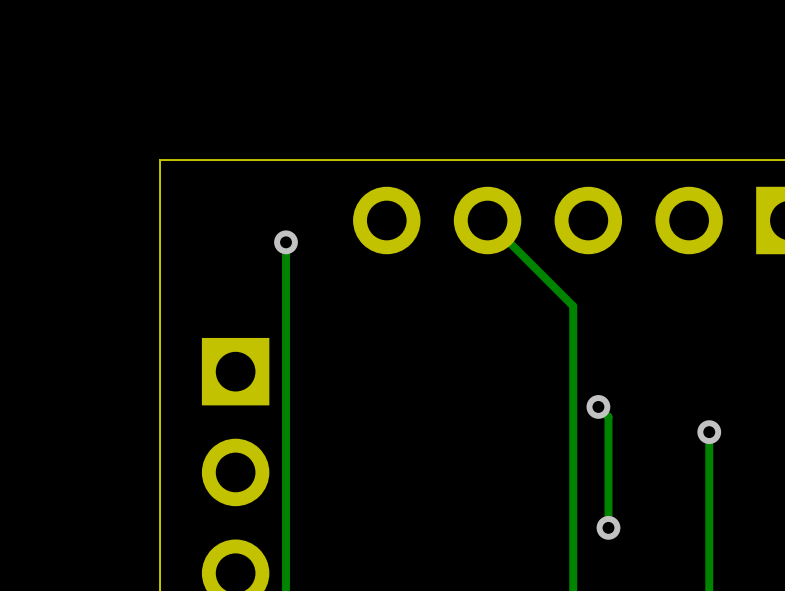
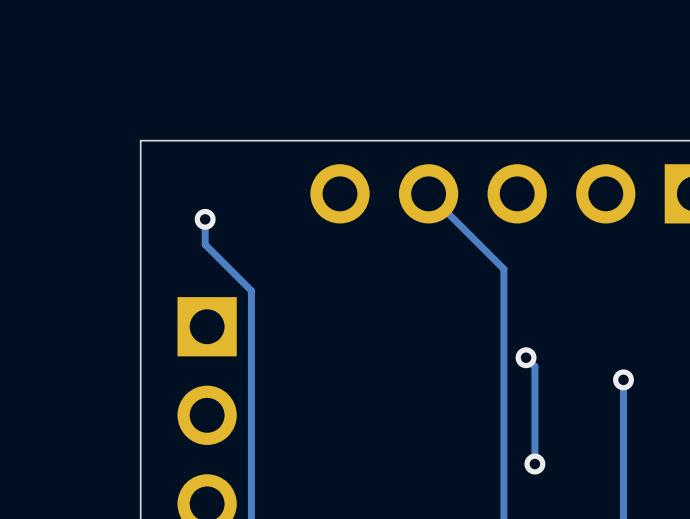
track: (286, 242) (286, 330) -> (205, 219) (205, 244) (251, 290)
via position: (286, 242) -> (205, 219)

